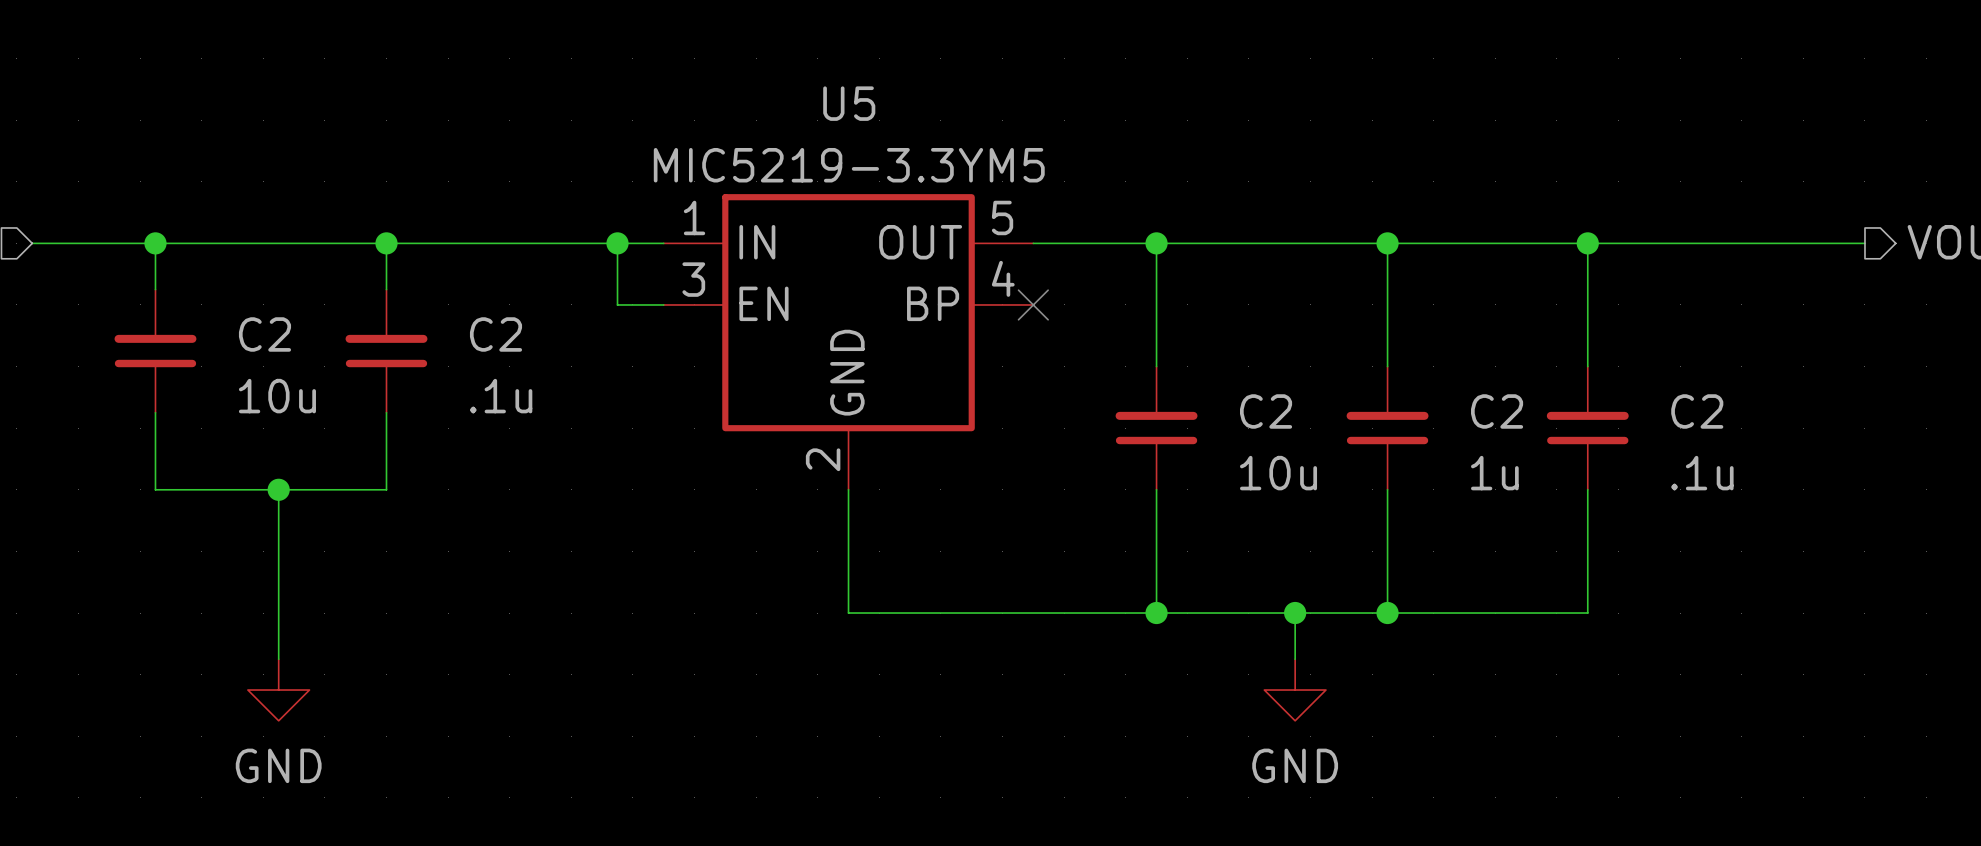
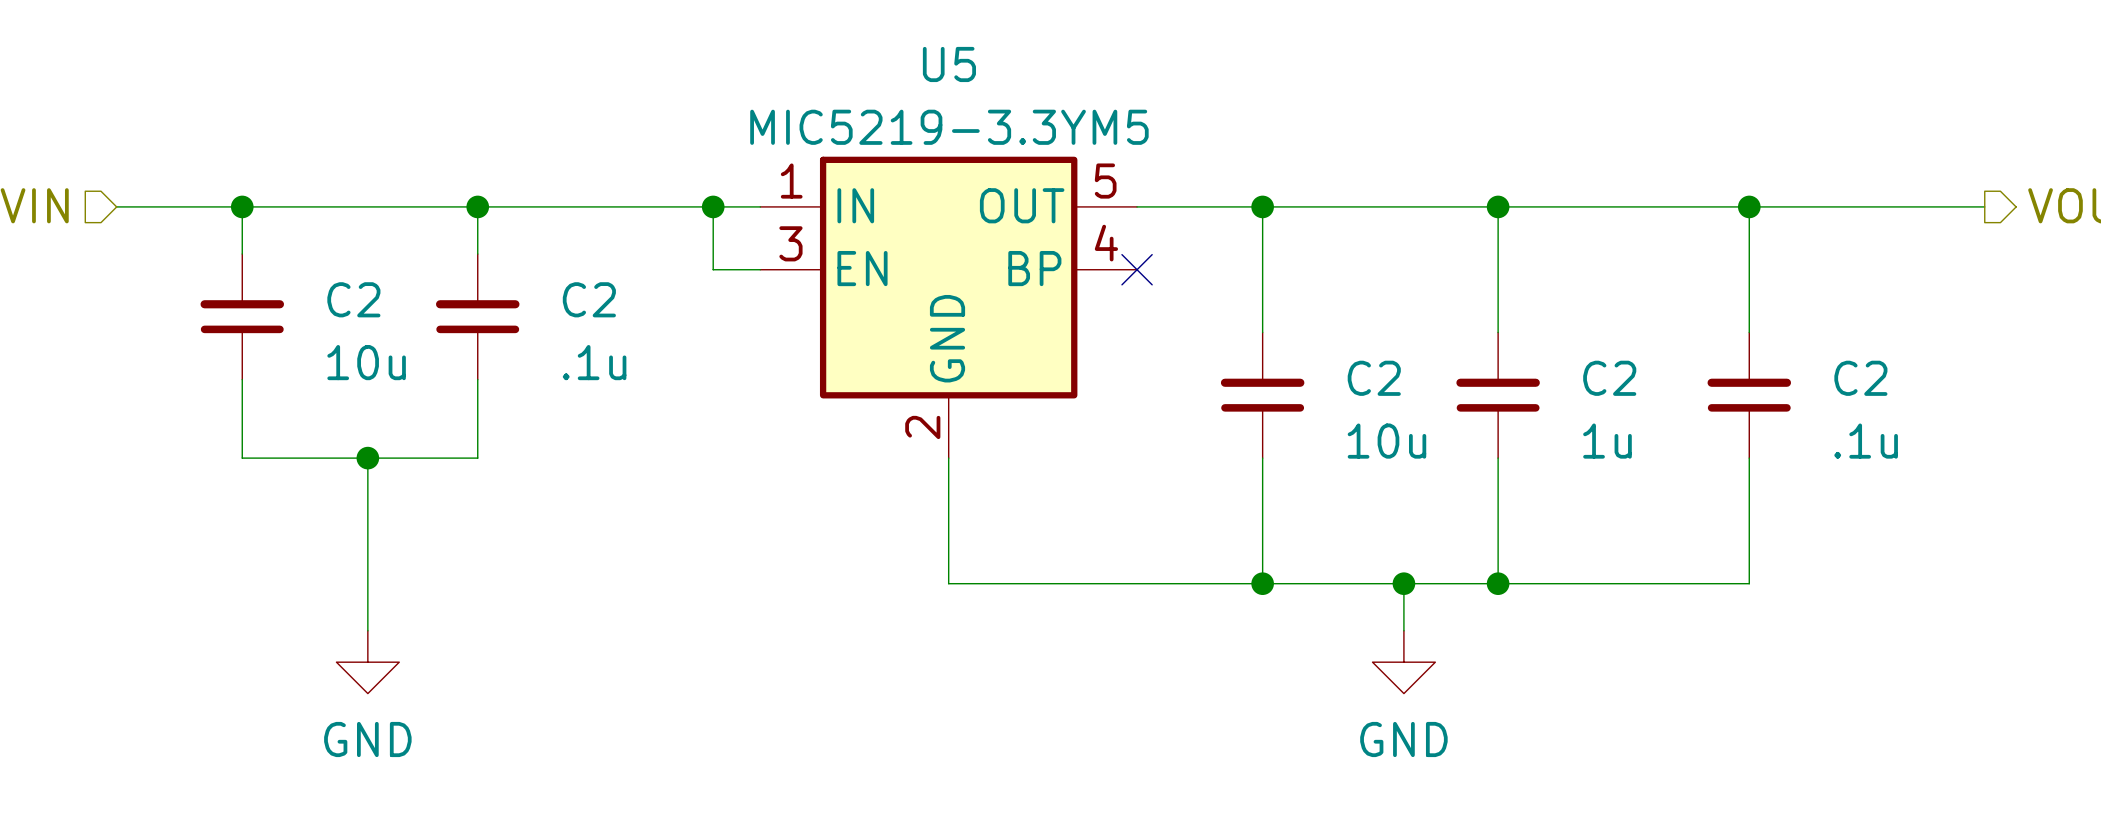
wire: (1587, 243) (1587, 366) -> (1749, 206) (1749, 332)
junction position: (1587, 243) -> (1749, 206)
C2 position: (1587, 428) -> (1749, 395)
wire: (1587, 489) (1587, 613) -> (1749, 458) (1749, 583) (1702, 583)

